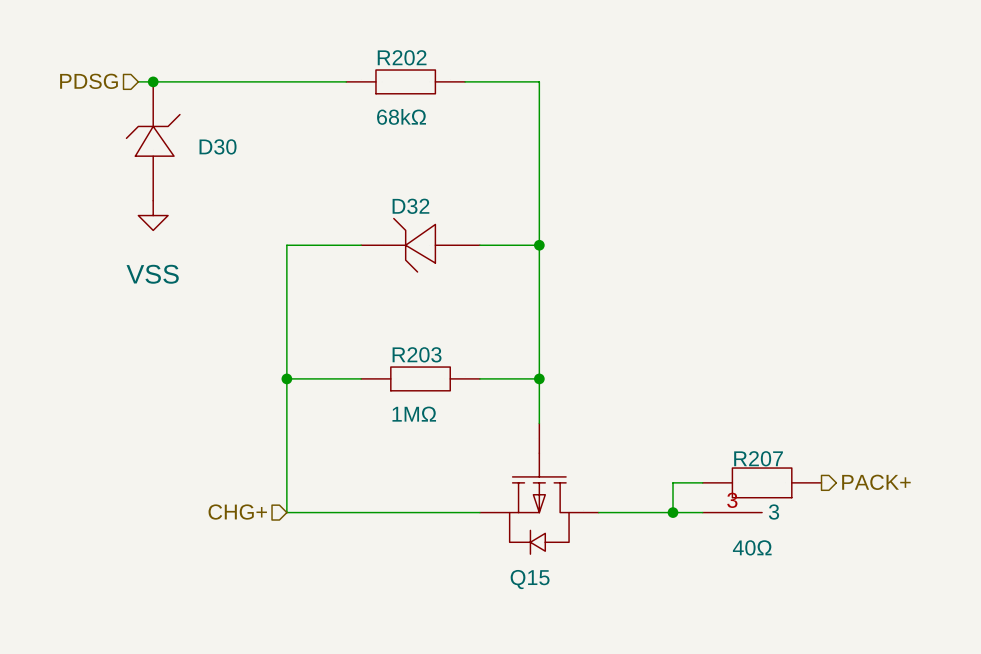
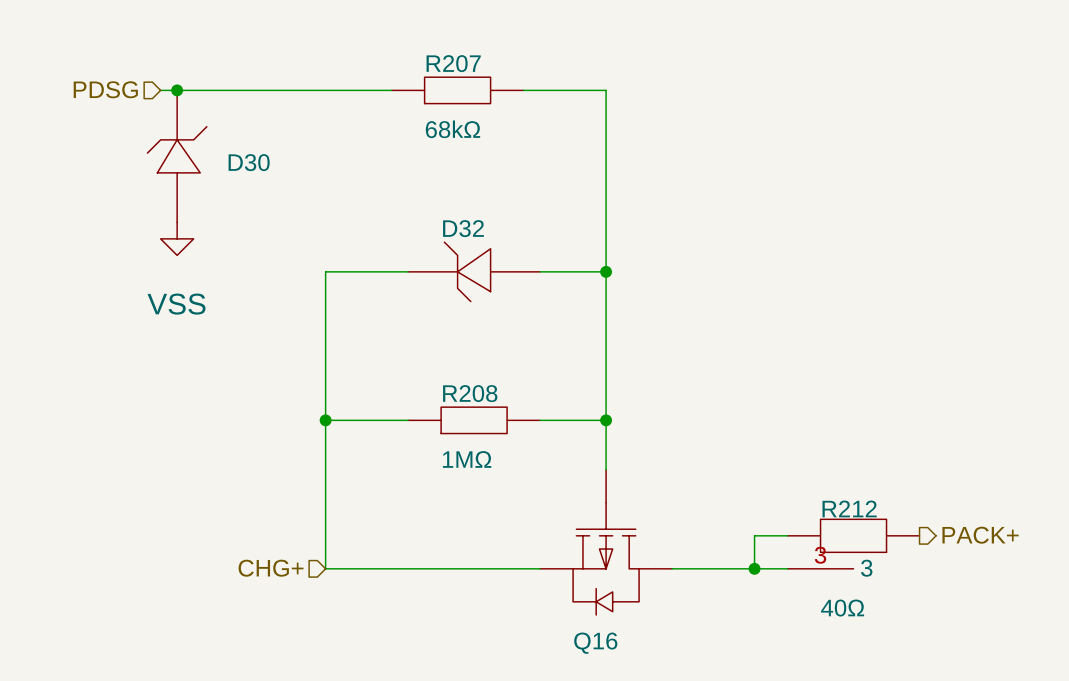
R202 name: R202 (402, 57) -> R207 (453, 63)
R203 name: R203 (417, 354) -> R208 (470, 393)
R207 name: R207 (758, 458) -> R212 (849, 508)
Q15 name: Q15 (530, 579) -> Q16 (595, 643)

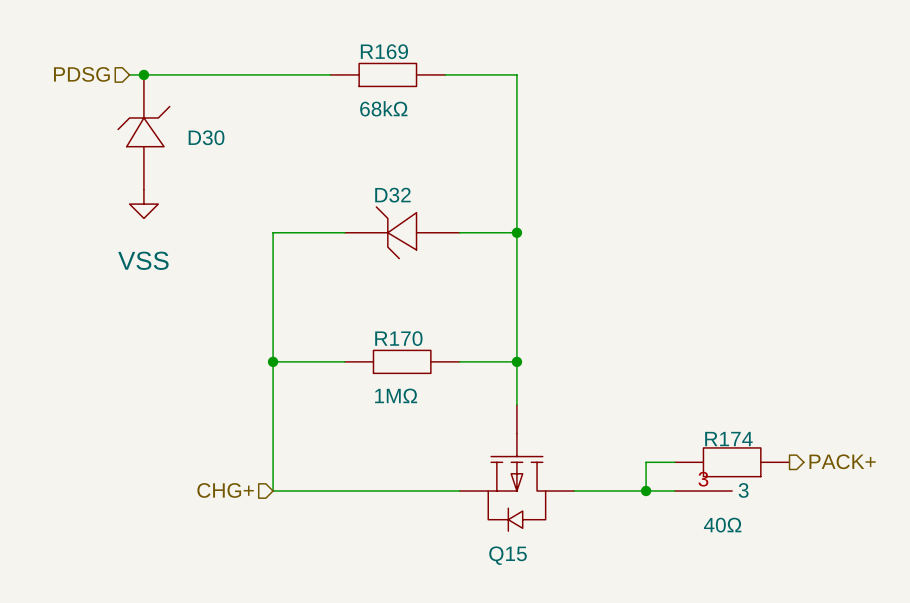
R207 name: R207 (453, 63) -> R169 (384, 51)
R208 name: R208 (470, 393) -> R170 (398, 338)
R212 name: R212 (849, 508) -> R174 (728, 439)
Q16 name: Q16 (595, 643) -> Q15 (508, 555)

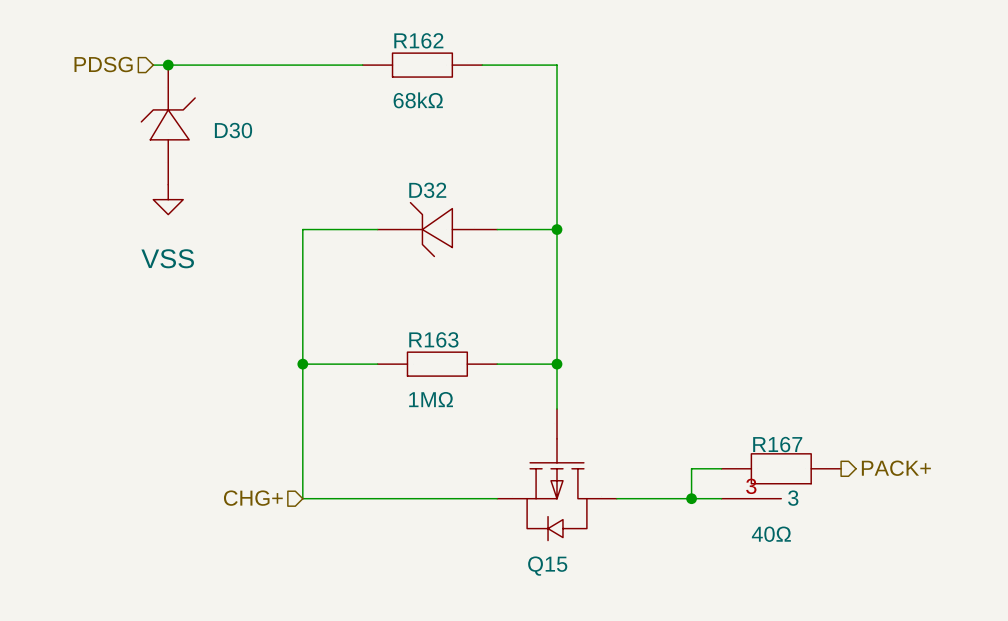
R169 name: R169 (384, 51) -> R162 (418, 40)
R170 name: R170 (398, 338) -> R163 (433, 339)
R174 name: R174 (728, 439) -> R167 (777, 444)

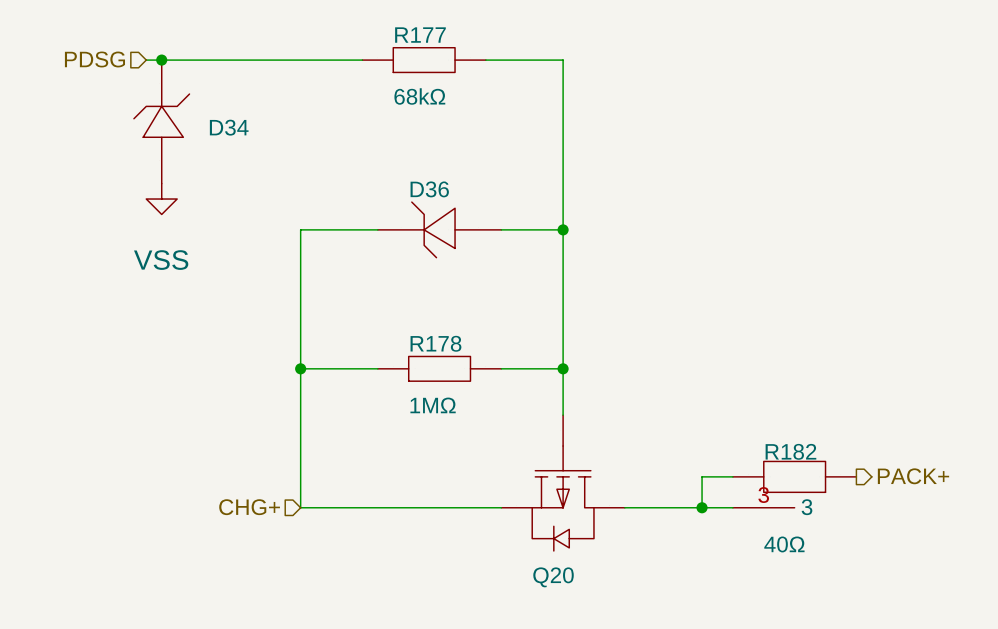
R162 name: R162 (418, 40) -> R177 (420, 35)
D30 name: D30 (233, 130) -> D34 (229, 127)
D32 name: D32 (427, 190) -> D36 (429, 189)
R163 name: R163 (433, 339) -> R178 (435, 343)
R167 name: R167 (777, 444) -> R182 (790, 451)
Q15 name: Q15 (547, 566) -> Q20 (553, 577)

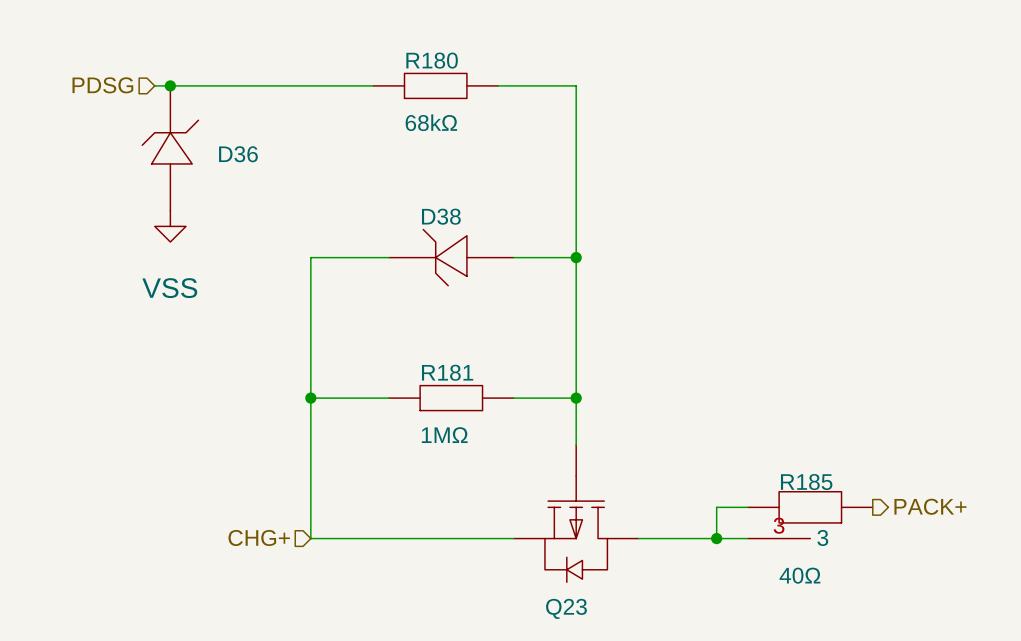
R177 name: R177 (420, 35) -> R180 (432, 60)
D34 name: D34 (229, 127) -> D36 (238, 154)
D36 name: D36 (429, 189) -> D38 (441, 216)
R178 name: R178 (435, 343) -> R181 (447, 372)
R182 name: R182 (790, 451) -> R185 (806, 482)
Q20 name: Q20 (553, 577) -> Q23 (566, 608)

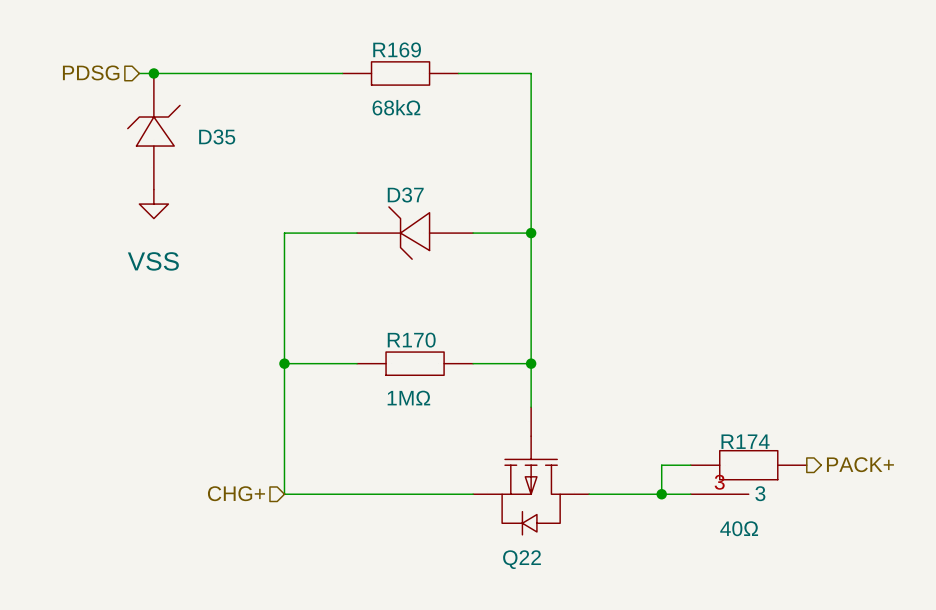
R180 name: R180 (432, 60) -> R169 (397, 49)
D36 name: D36 (238, 154) -> D35 (217, 136)
D38 name: D38 (441, 216) -> D37 (405, 195)
R181 name: R181 (447, 372) -> R170 (411, 340)
R185 name: R185 (806, 482) -> R174 (745, 441)
Q23 name: Q23 (566, 608) -> Q22 (522, 559)

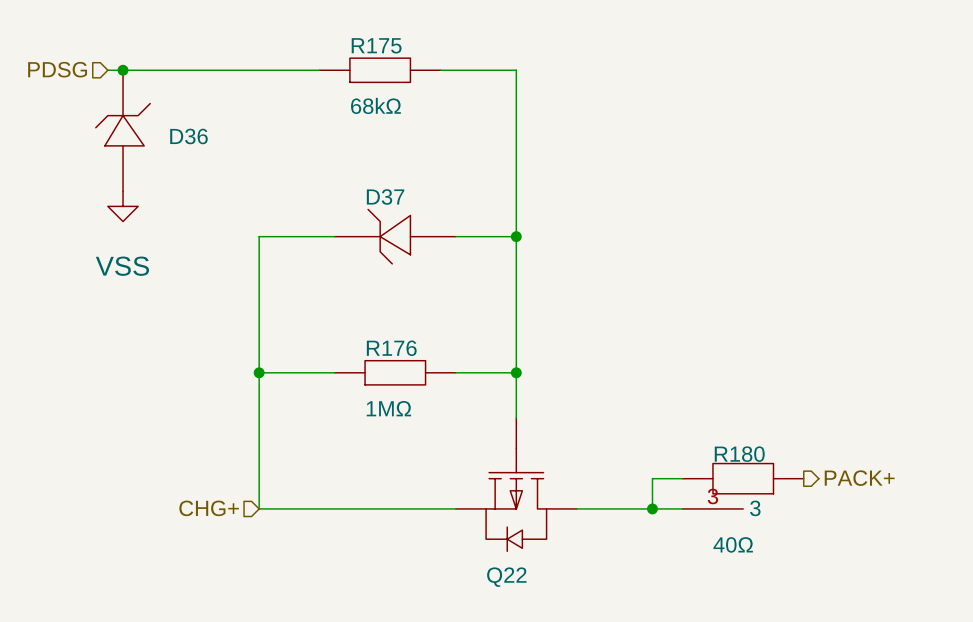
R169 name: R169 (397, 49) -> R175 (376, 45)
D35 name: D35 (217, 136) -> D36 (188, 136)
R170 name: R170 (411, 340) -> R176 (391, 348)
R174 name: R174 (745, 441) -> R180 (739, 454)

